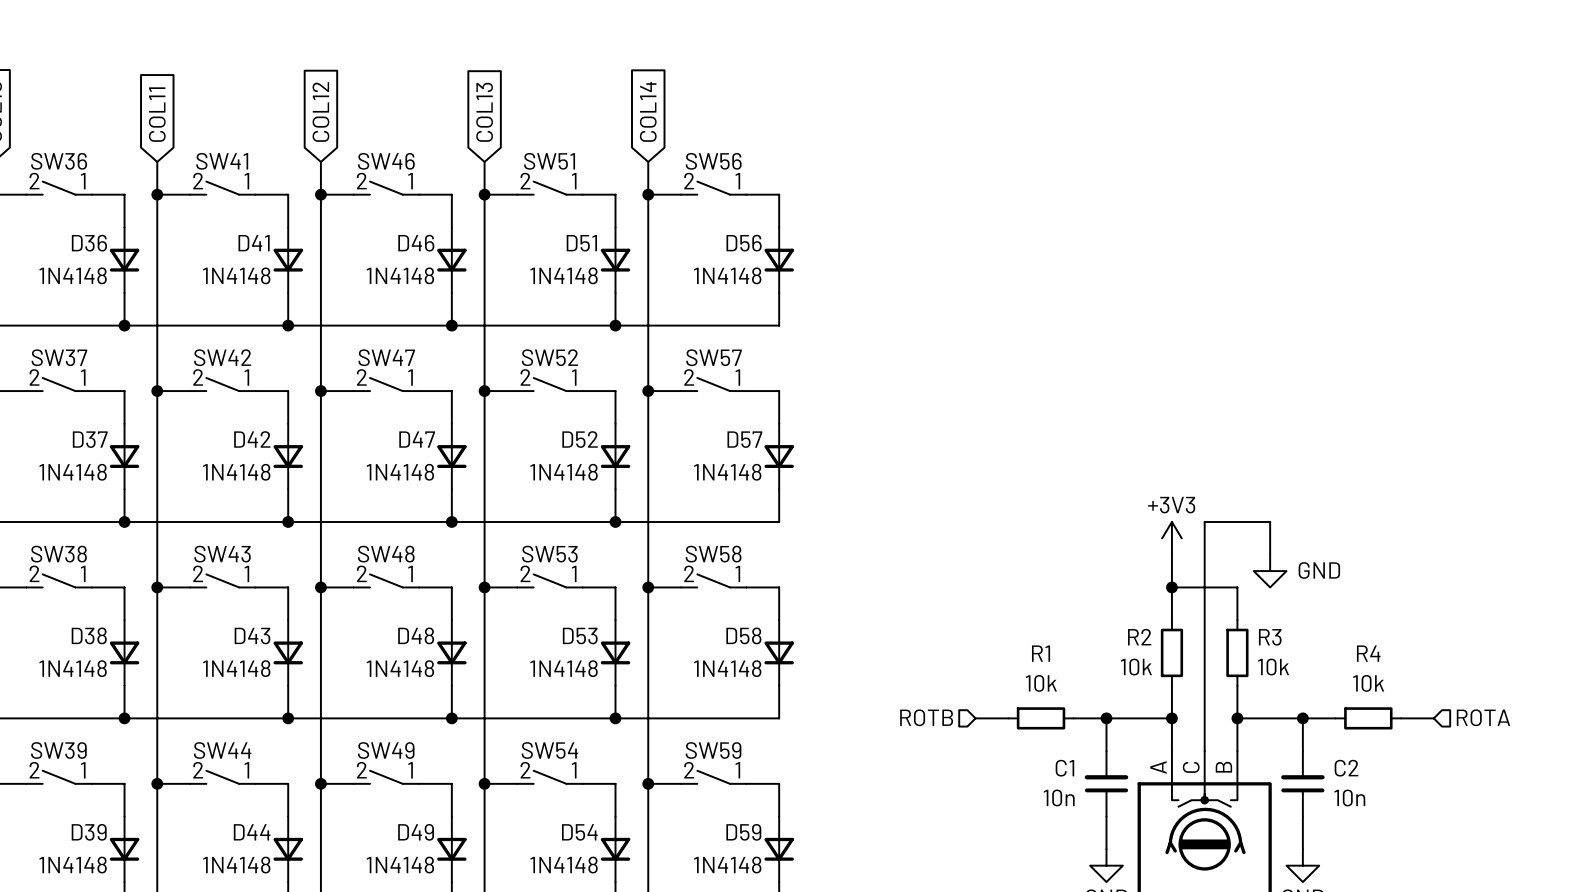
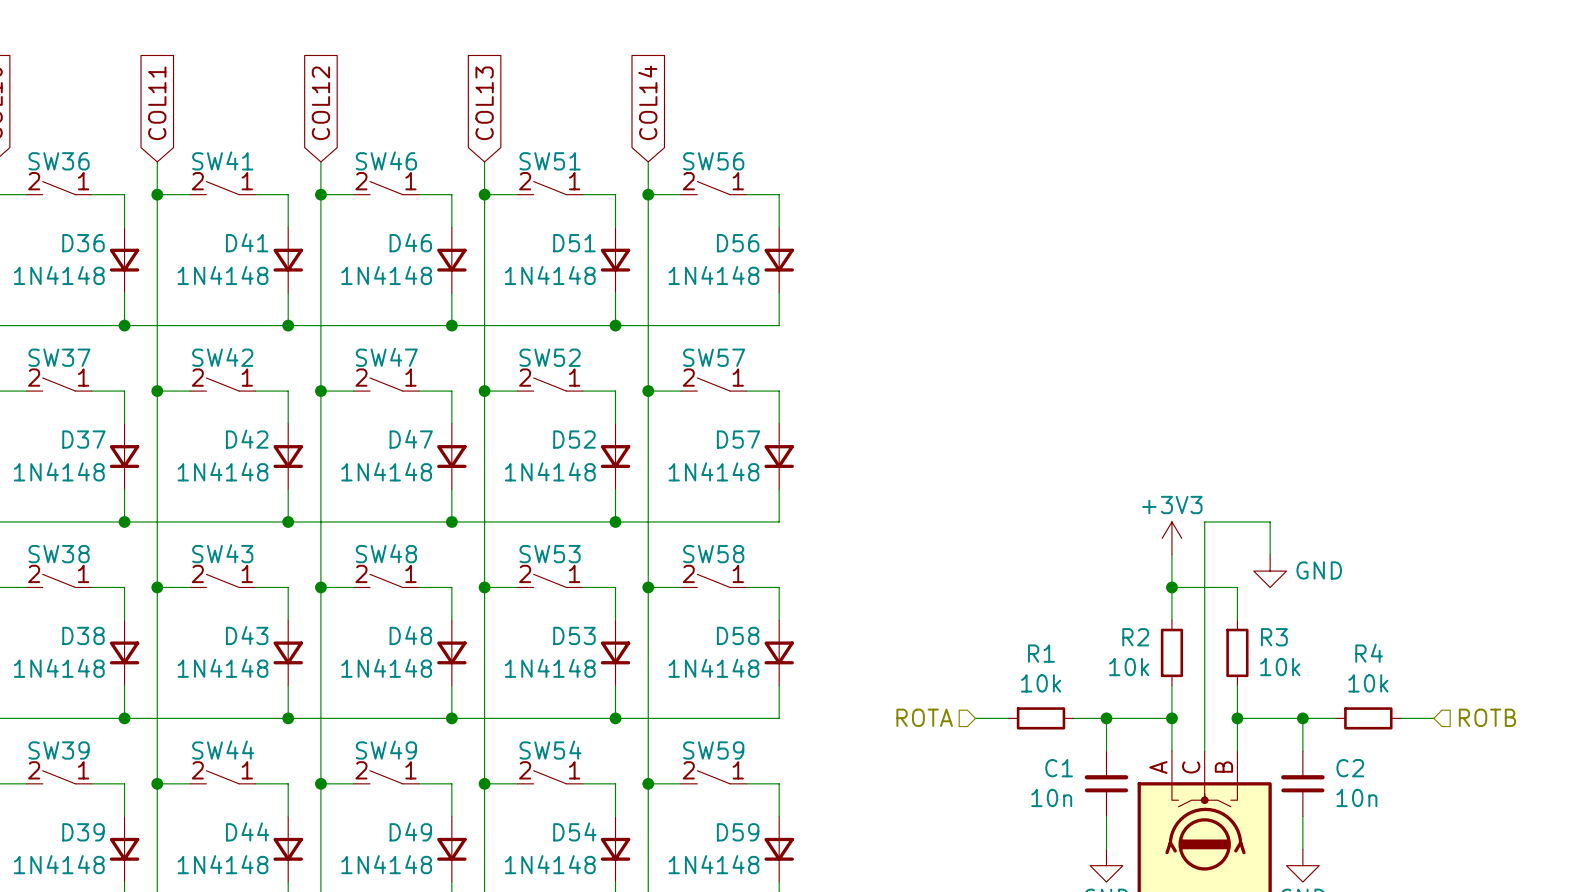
hierarchical label: ROTB (926, 717) -> ROTA (924, 717)
hierarchical label: ROTA (1483, 717) -> ROTB (1487, 717)

